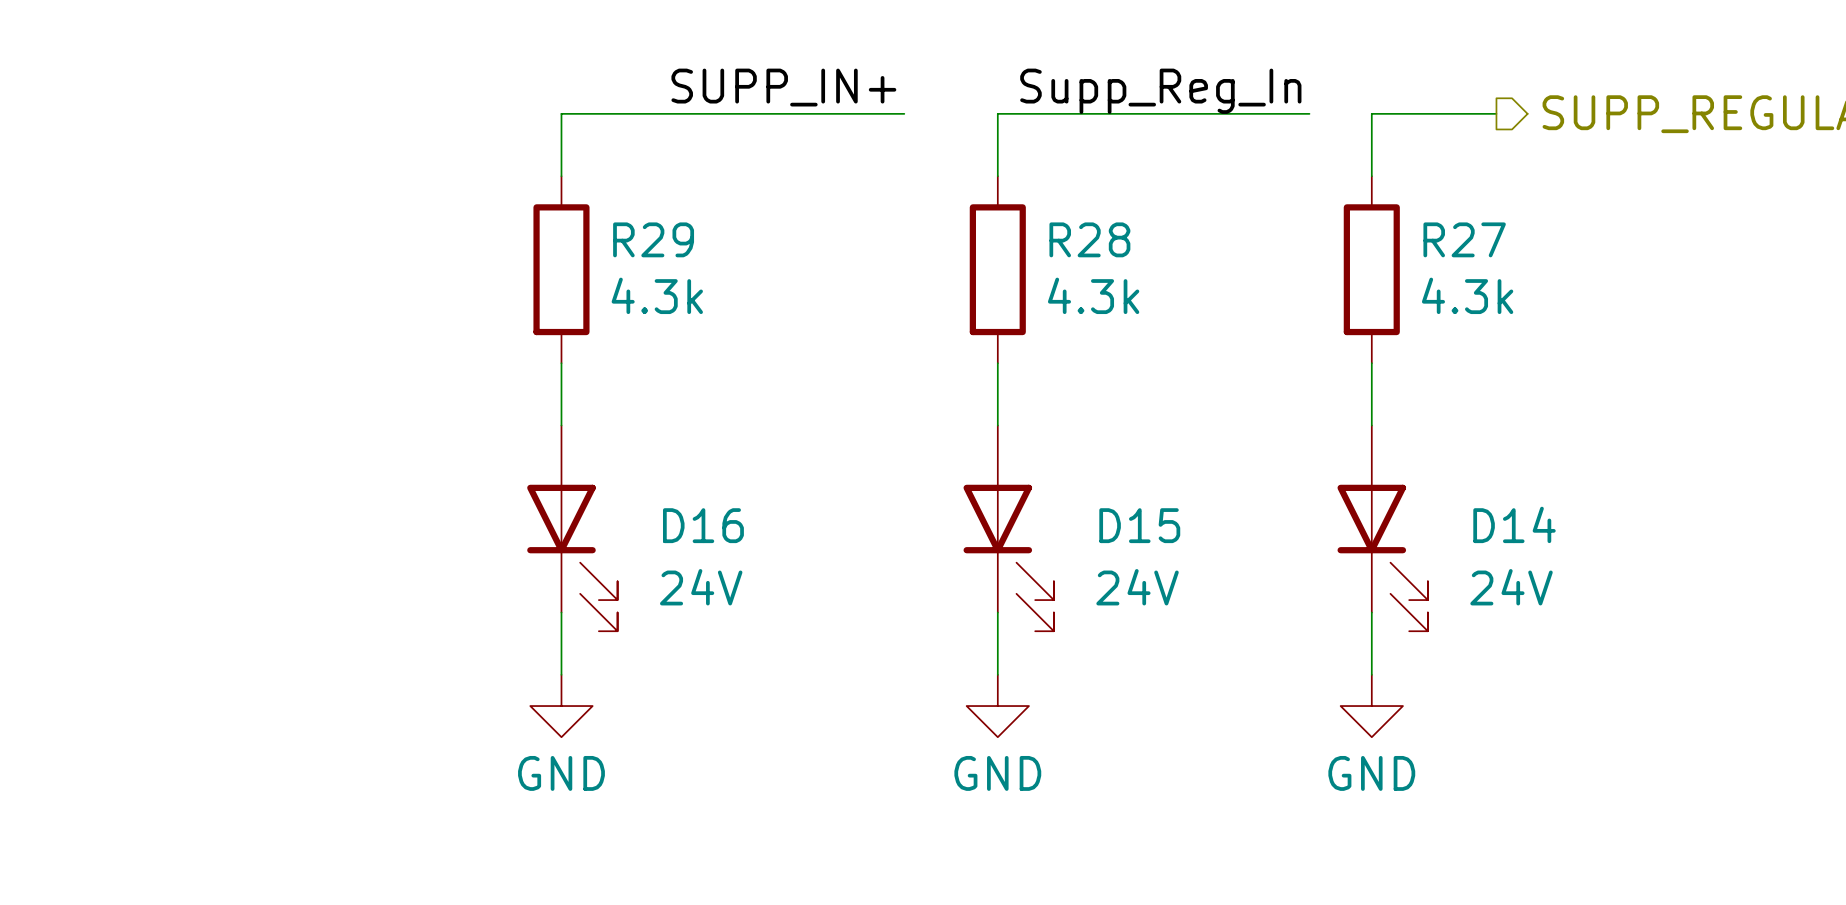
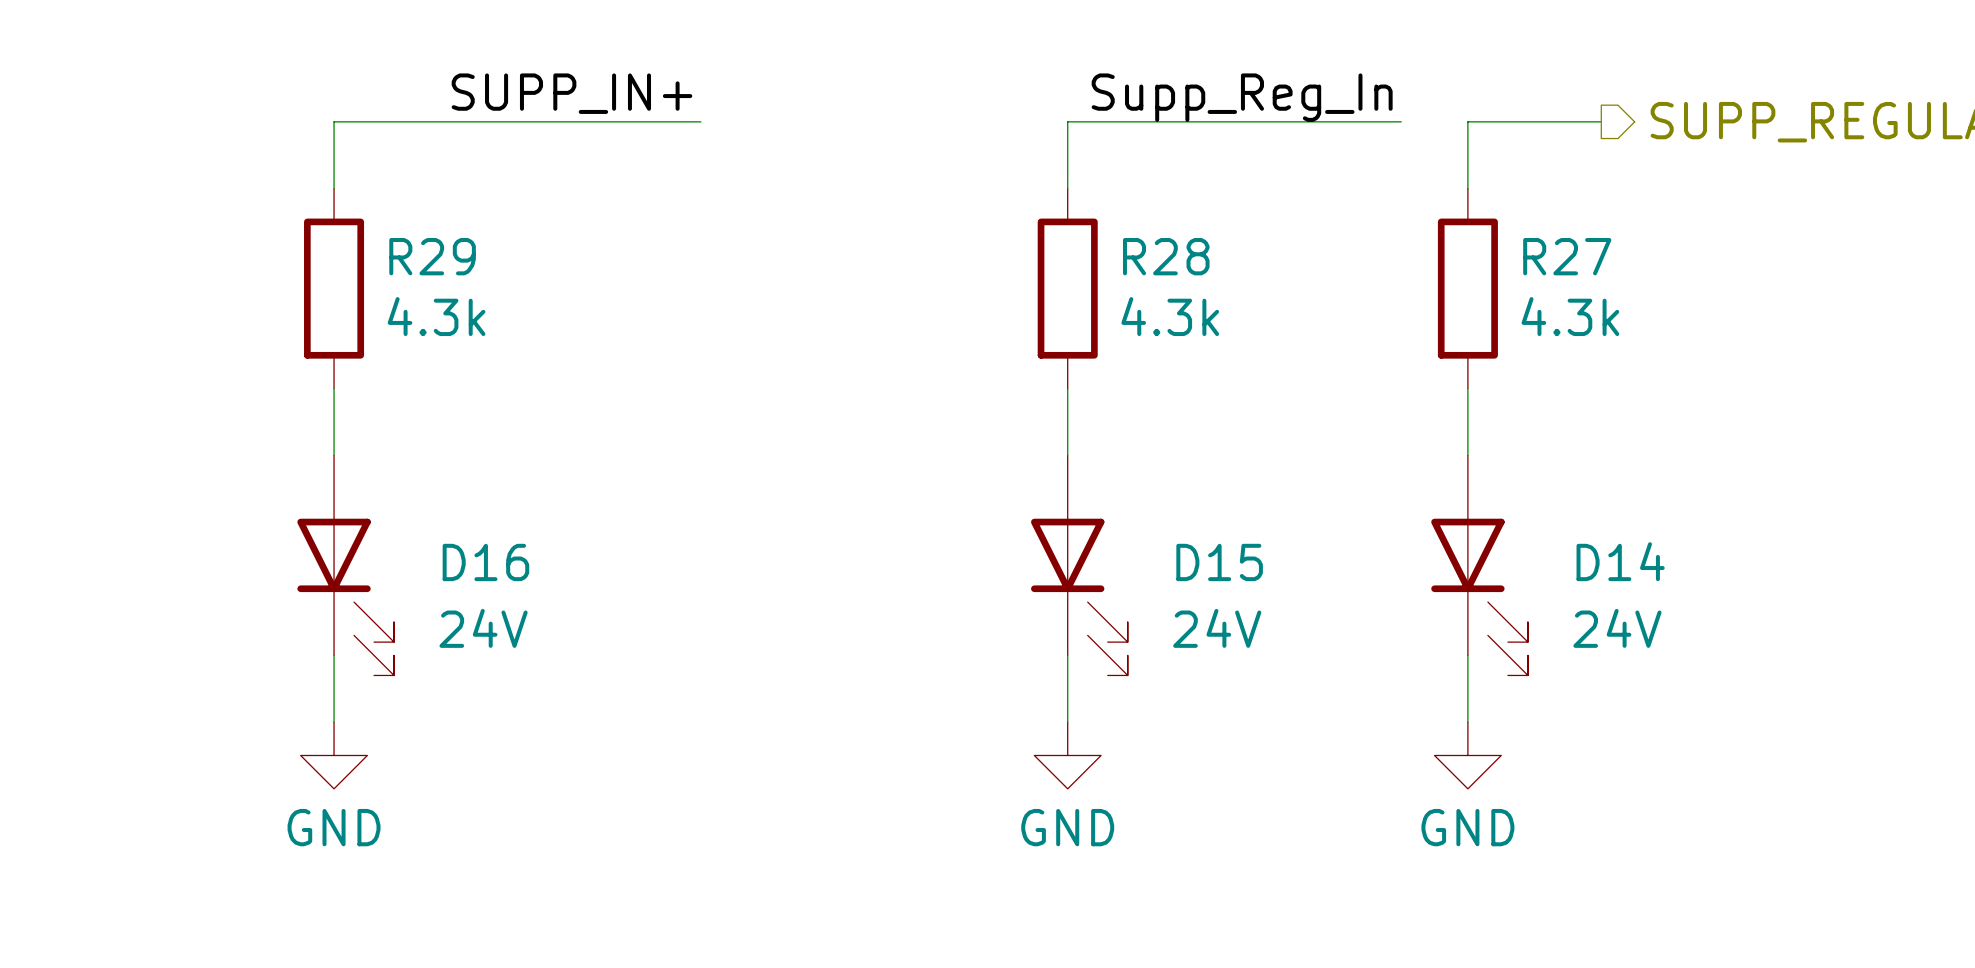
label position: SUPP_IN+ (783, 87) -> SUPP_IN+ (571, 93)
wire: (561, 113) (561, 176) -> (600, 121) (334, 121) (334, 188)
wire: (654, 113) (904, 113) -> none
R29 position: (561, 269) -> (334, 288)
wire: (561, 363) (561, 425) -> (334, 388) (334, 455)
D16 position: (572, 528) -> (345, 565)
wire: (561, 612) (561, 674) -> (334, 655) (334, 722)
power symbol position: GND (561, 706) -> GND (334, 755)

